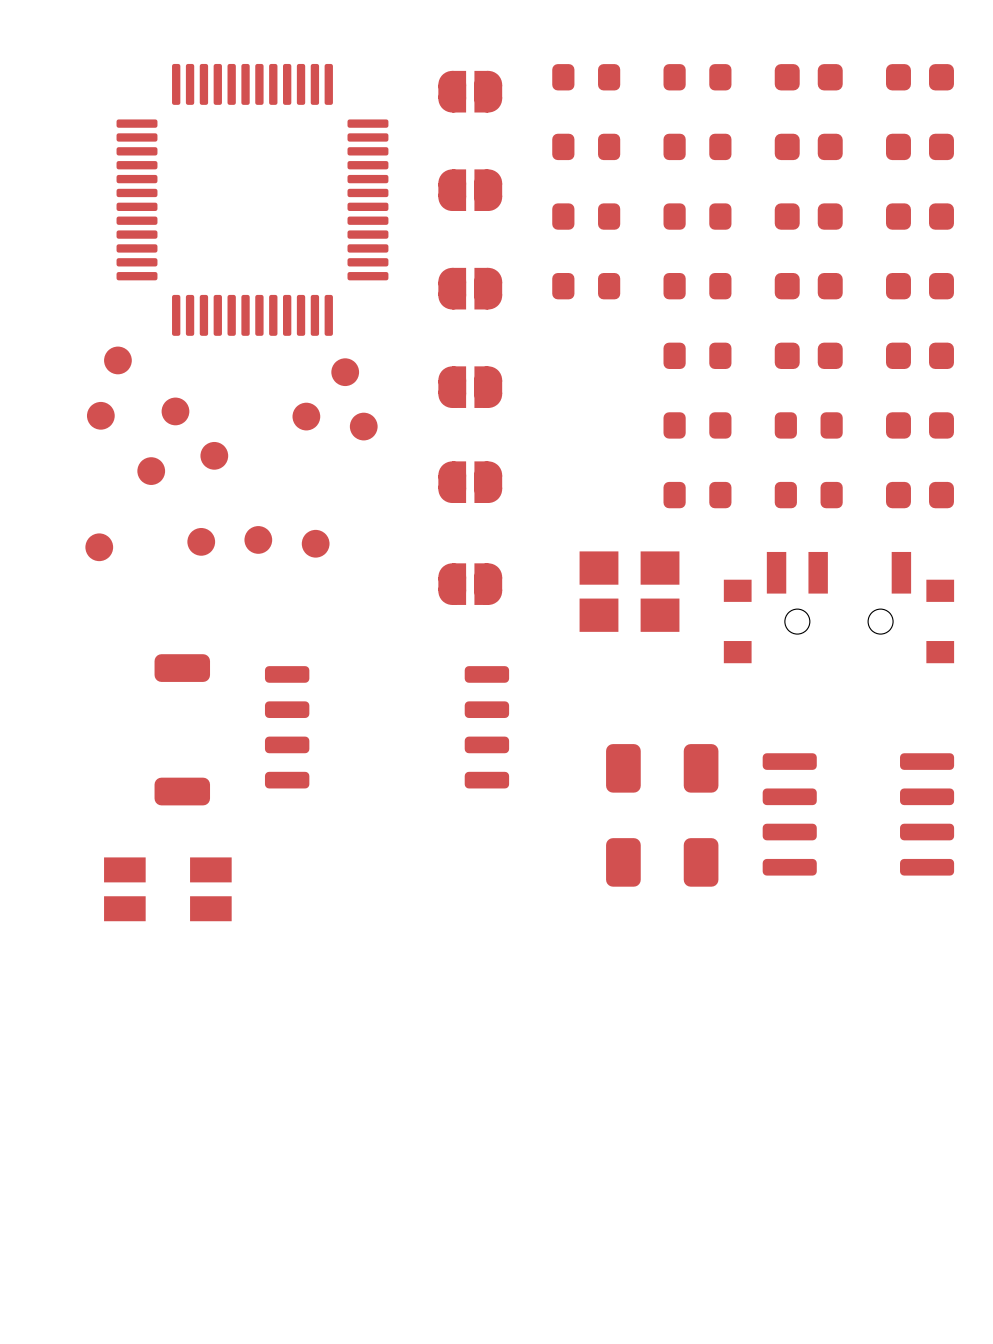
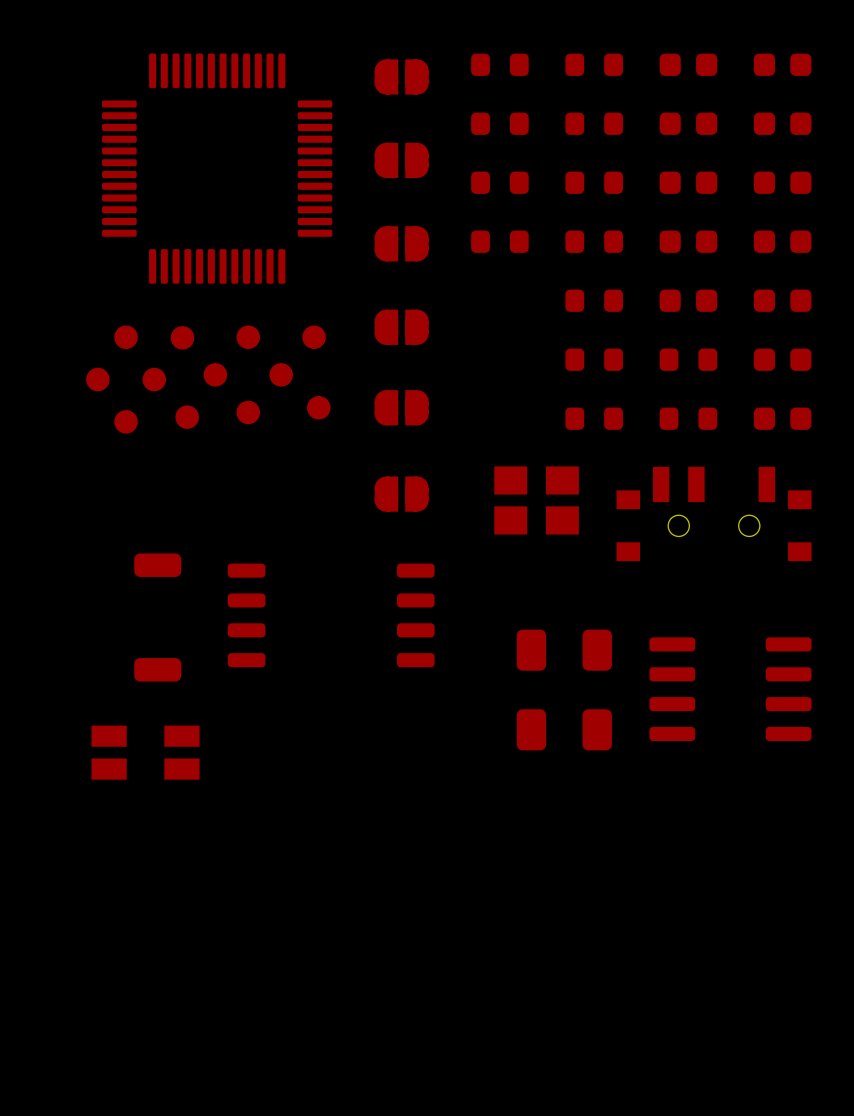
part: (117, 360) -> none
part: (345, 372) -> none
part: none -> (126, 337)
part: none -> (248, 337)
part: none -> (314, 337)
part: none -> (182, 337)
part: (175, 411) -> none
part: (100, 415) -> none
part: (306, 416) -> none
part: (363, 426) -> none
part: none -> (215, 374)
part: none -> (281, 374)
part: none -> (97, 379)
part: none -> (154, 379)
part: (214, 455) -> none
part: (151, 471) -> none
part: none -> (318, 407)
part: none -> (248, 412)
part: none -> (187, 417)
part: none -> (126, 421)
part: (258, 539) -> none
part: (201, 541) -> none
part: (315, 543) -> none
part: (99, 547) -> none

